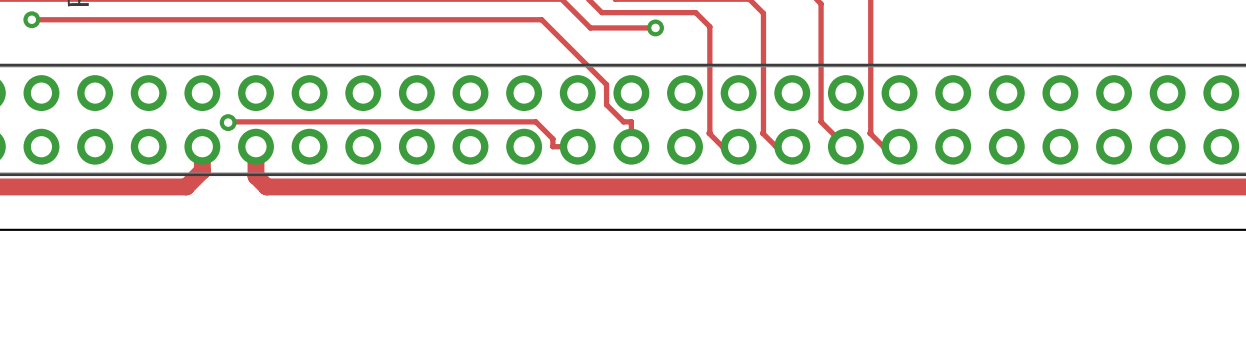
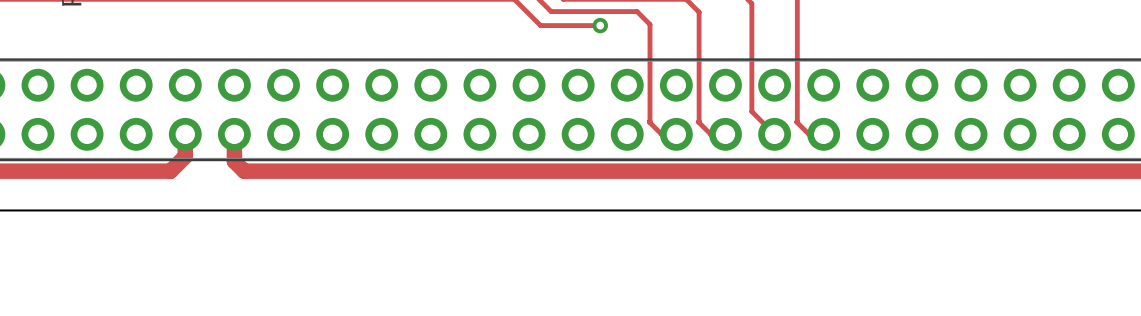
track: (31, 19) (541, 19) (606, 84) (606, 104) (623, 121) (631, 121) (631, 146) -> none
via: (31, 19) -> none
track: (228, 122) (535, 121) (552, 138) (552, 146) (577, 146) -> none
via: (228, 122) -> none

